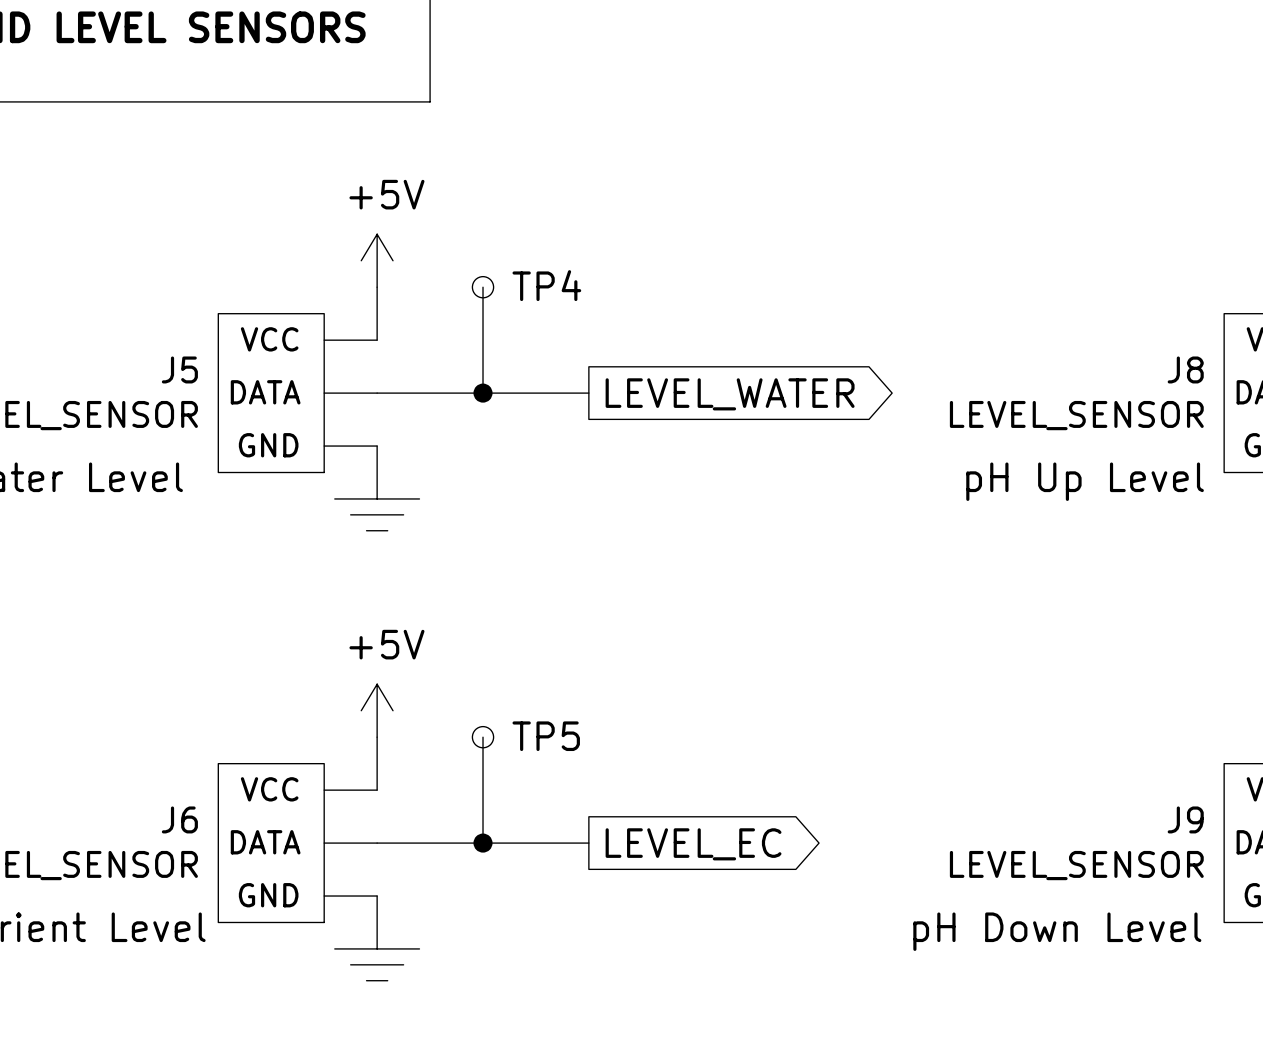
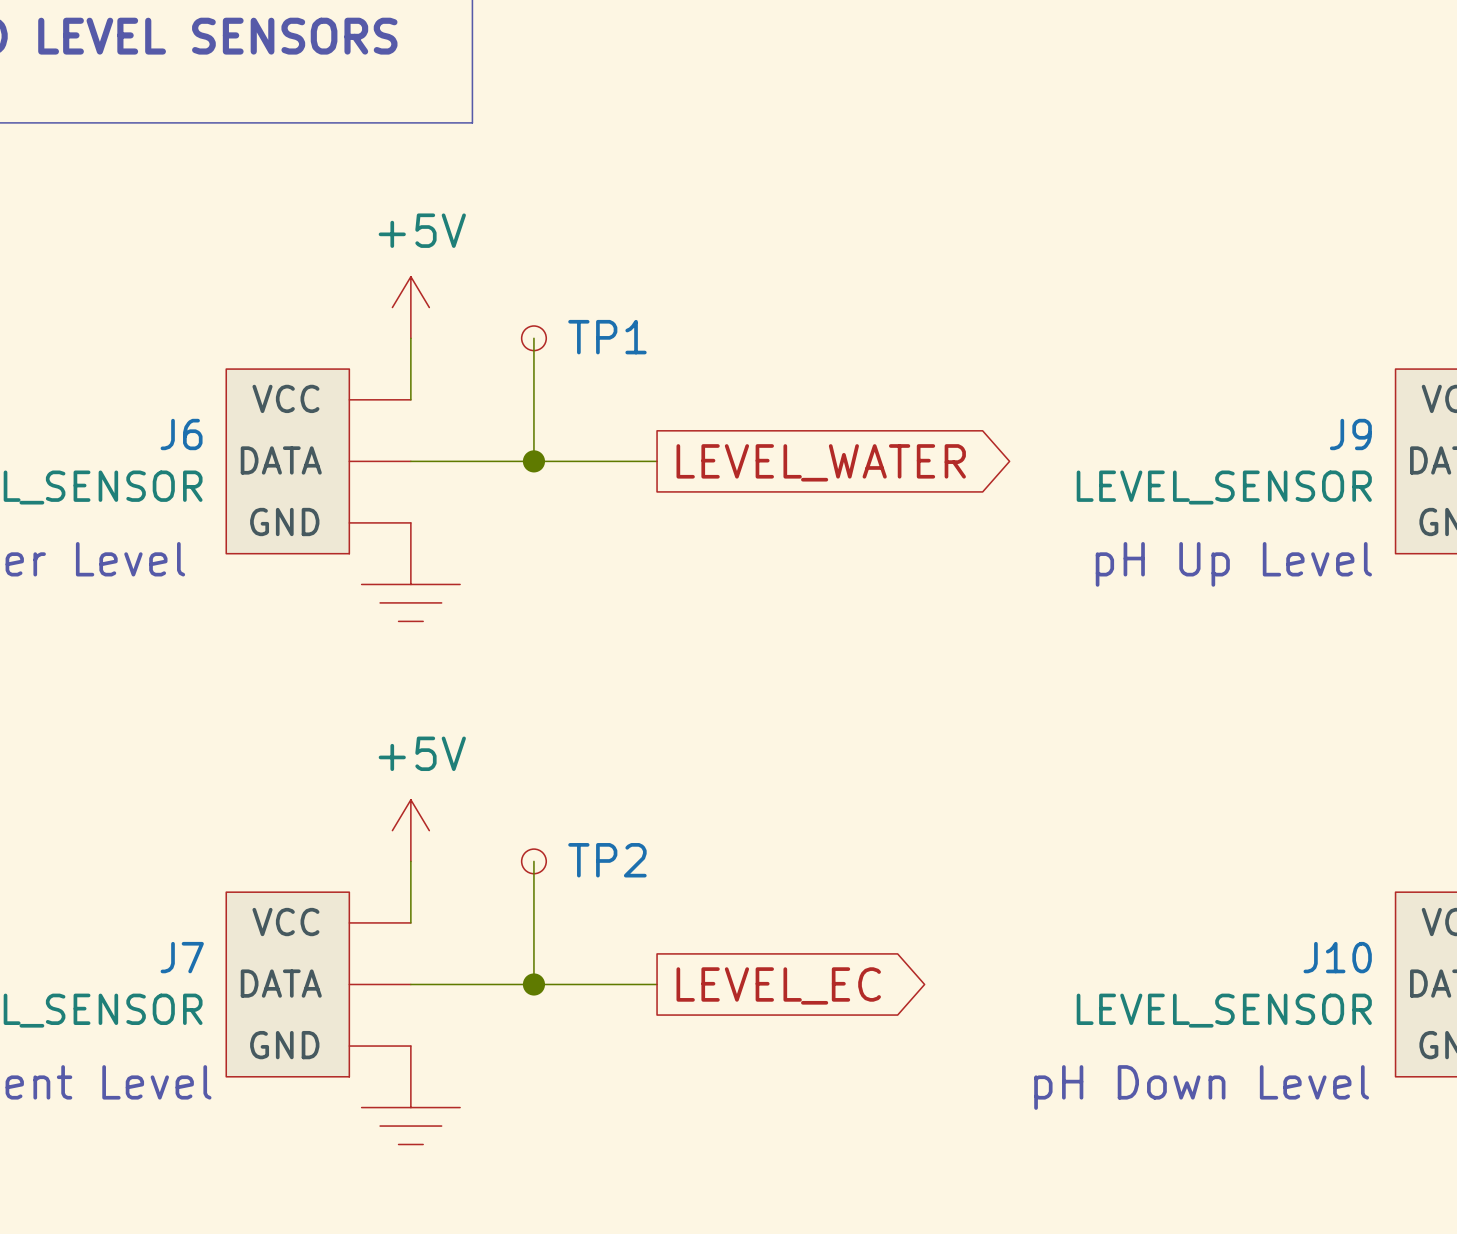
TP4 name: TP4 (546, 285) -> TP1 (607, 337)
J5 name: J5 (179, 369) -> J6 (181, 434)
J8 name: J8 (1185, 369) -> J9 (1350, 434)
TP5 name: TP5 (546, 736) -> TP2 (607, 860)
J6 name: J6 (179, 819) -> J7 (182, 957)
J9 name: J9 (1185, 819) -> J10 (1337, 957)

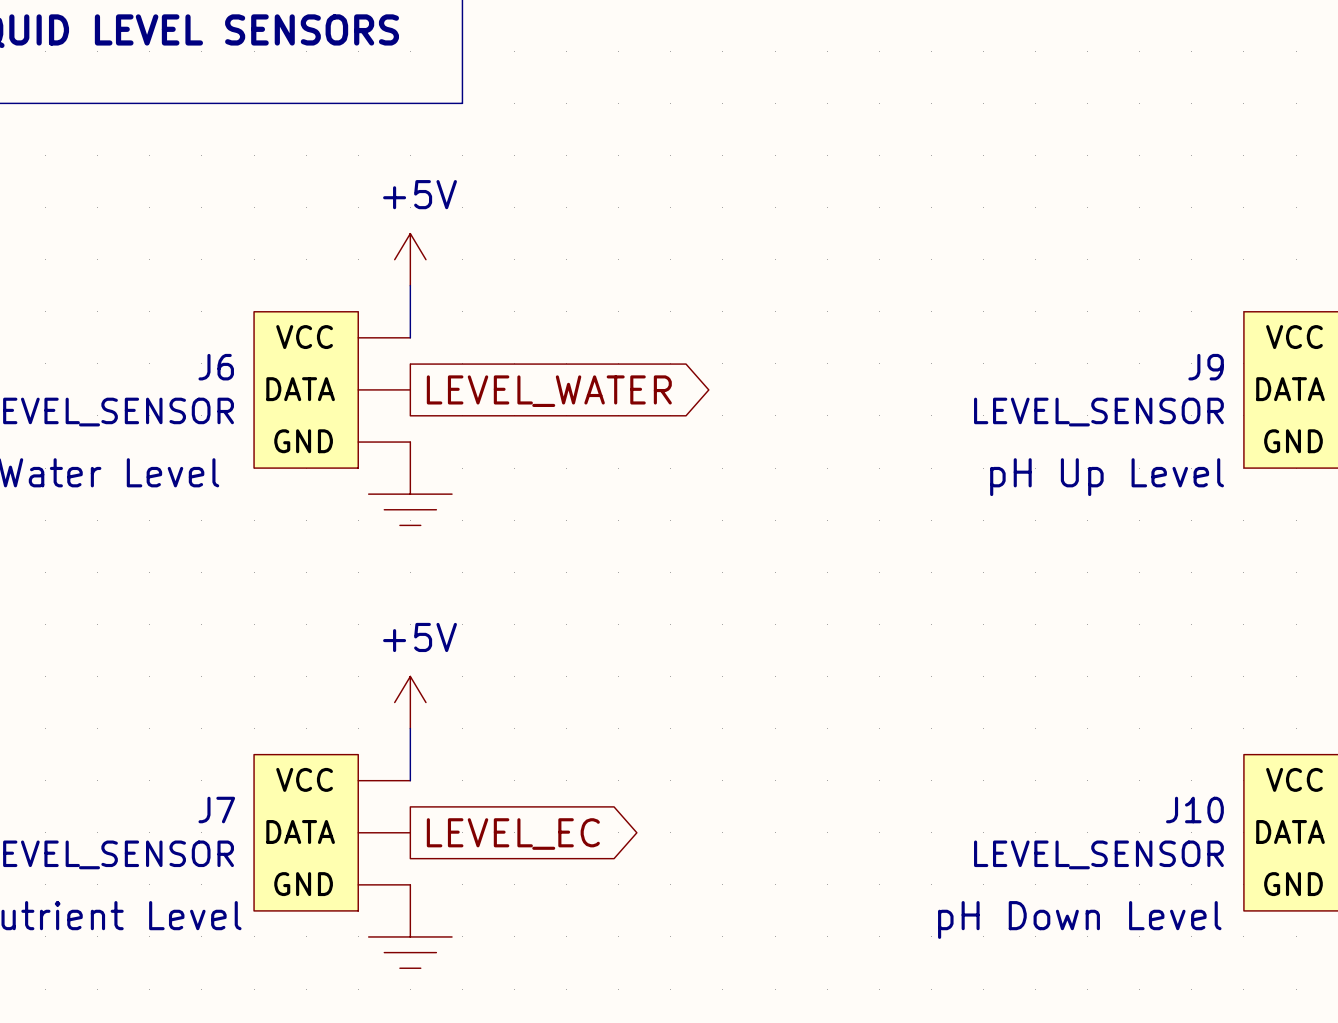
wire: (533, 338) (533, 461) -> none
TP1: (533, 338) -> none
wire: (410, 461) (657, 461) -> none
junction: (533, 461) -> none
global label position: LEVEL_WATER (821, 462) -> LEVEL_WATER (549, 391)
wire: (533, 861) (533, 984) -> none
TP2: (533, 861) -> none
wire: (410, 984) (657, 984) -> none
junction: (533, 984) -> none
global label position: LEVEL_EC (778, 985) -> LEVEL_EC (513, 834)

